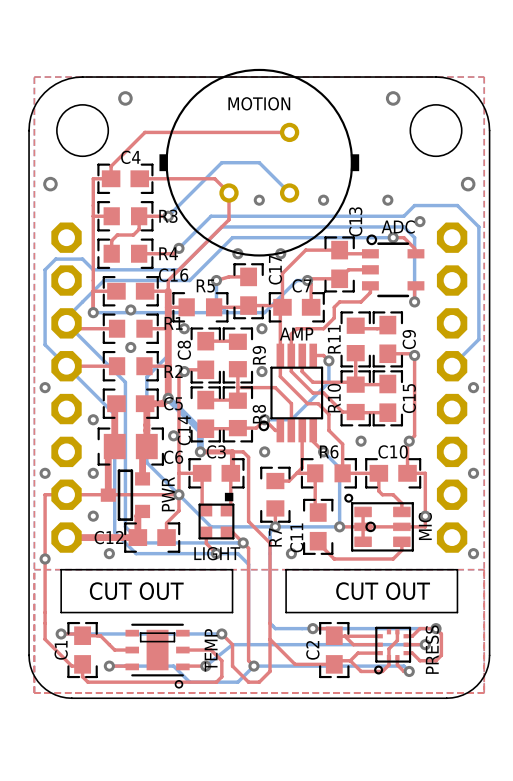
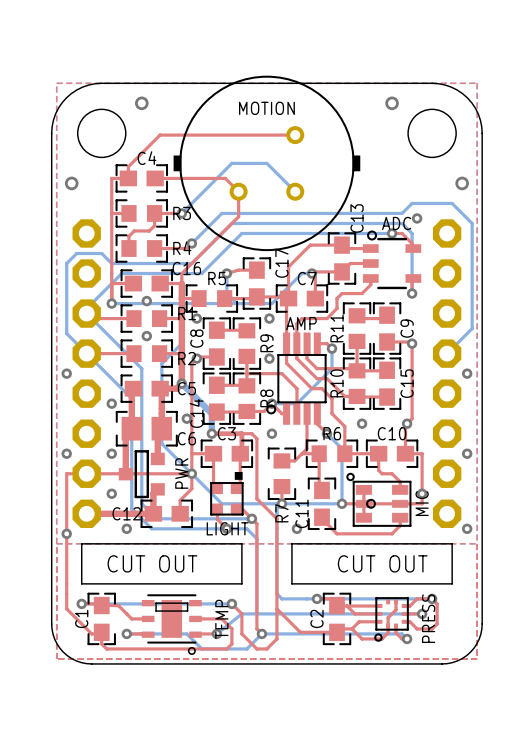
via: (259, 200) -> none
via: (323, 200) -> none
via: (387, 200) -> none
via: (237, 253) -> none
via: (280, 253) -> none

